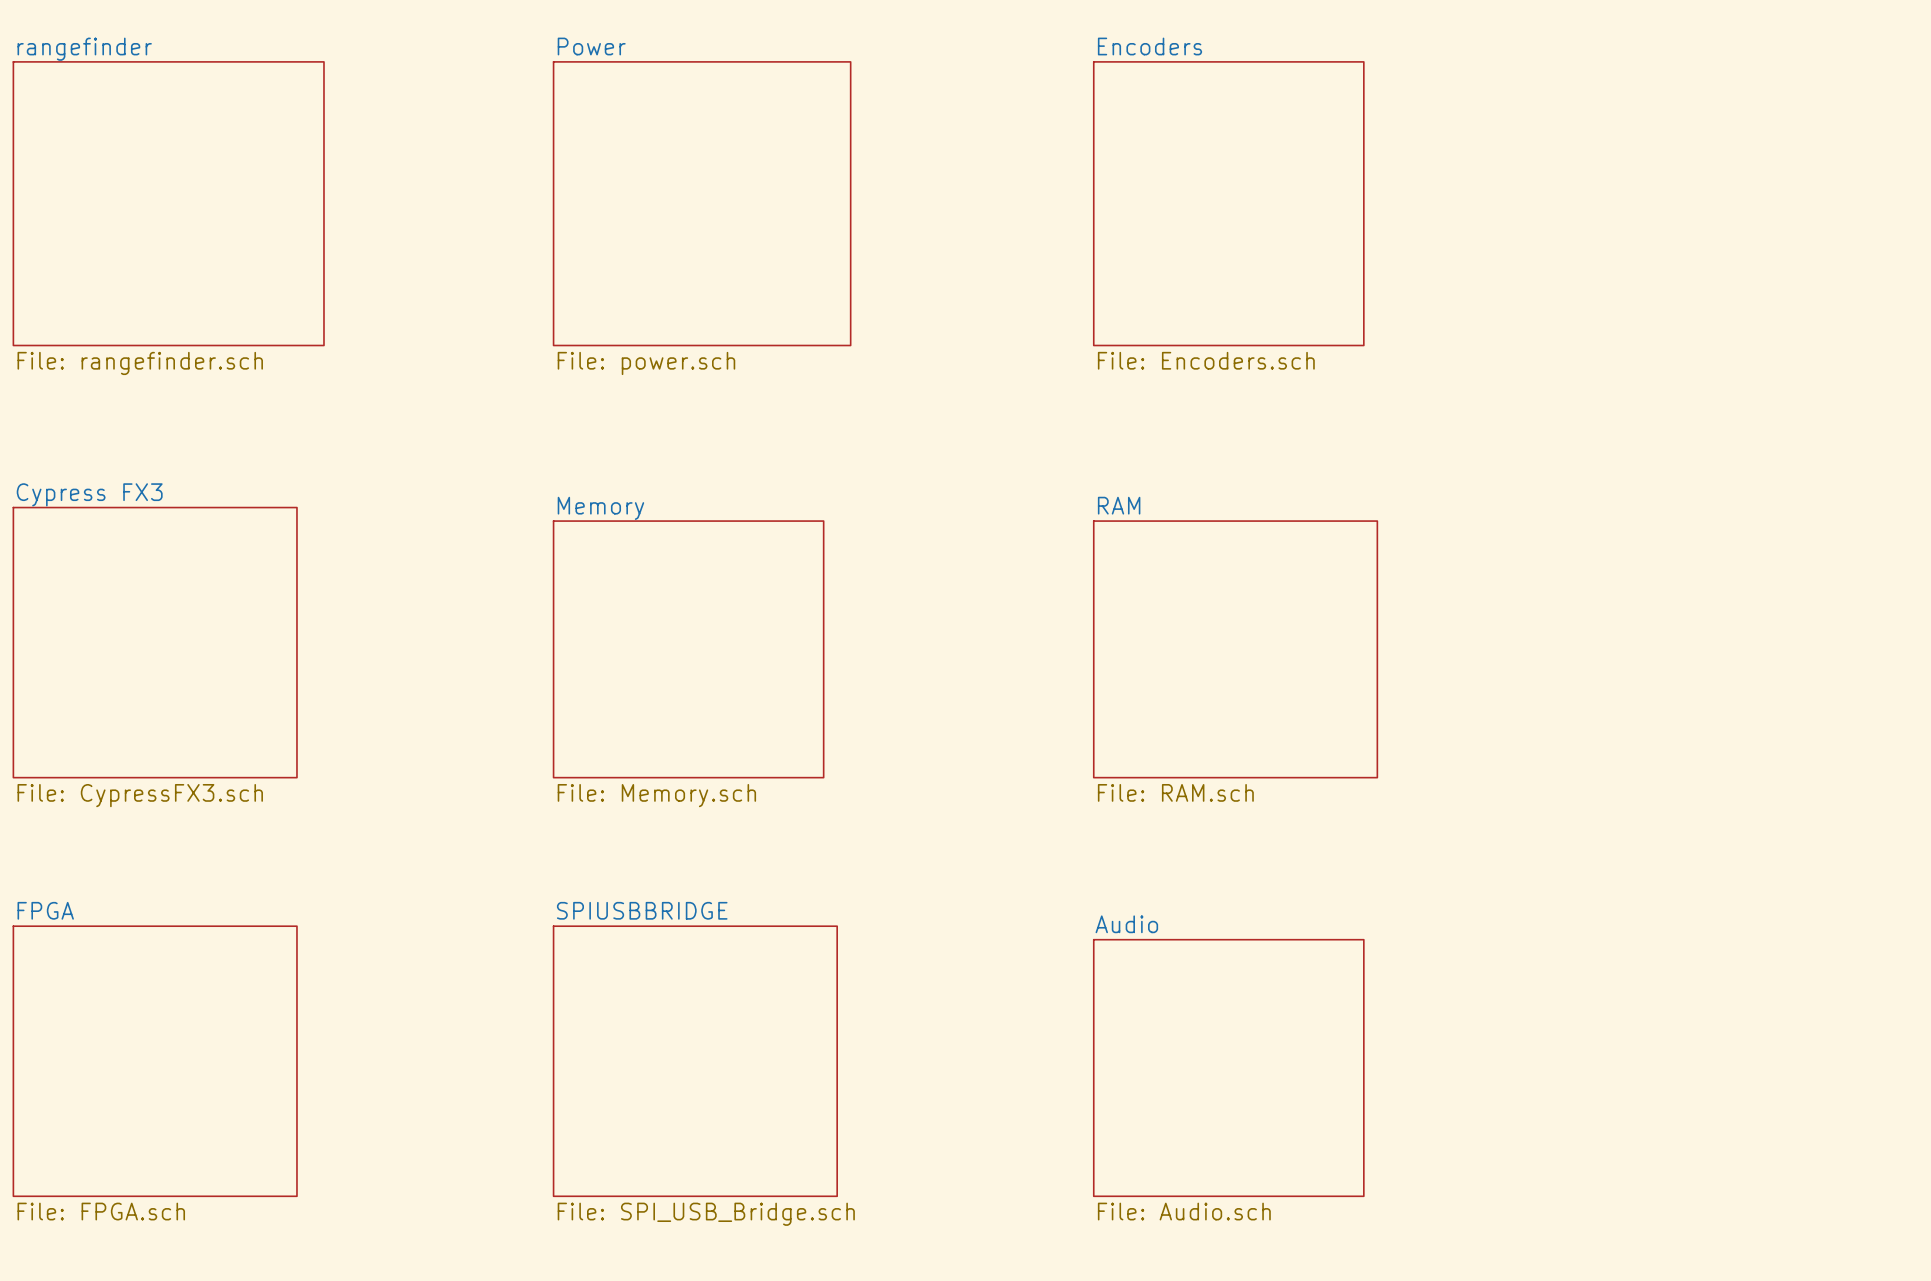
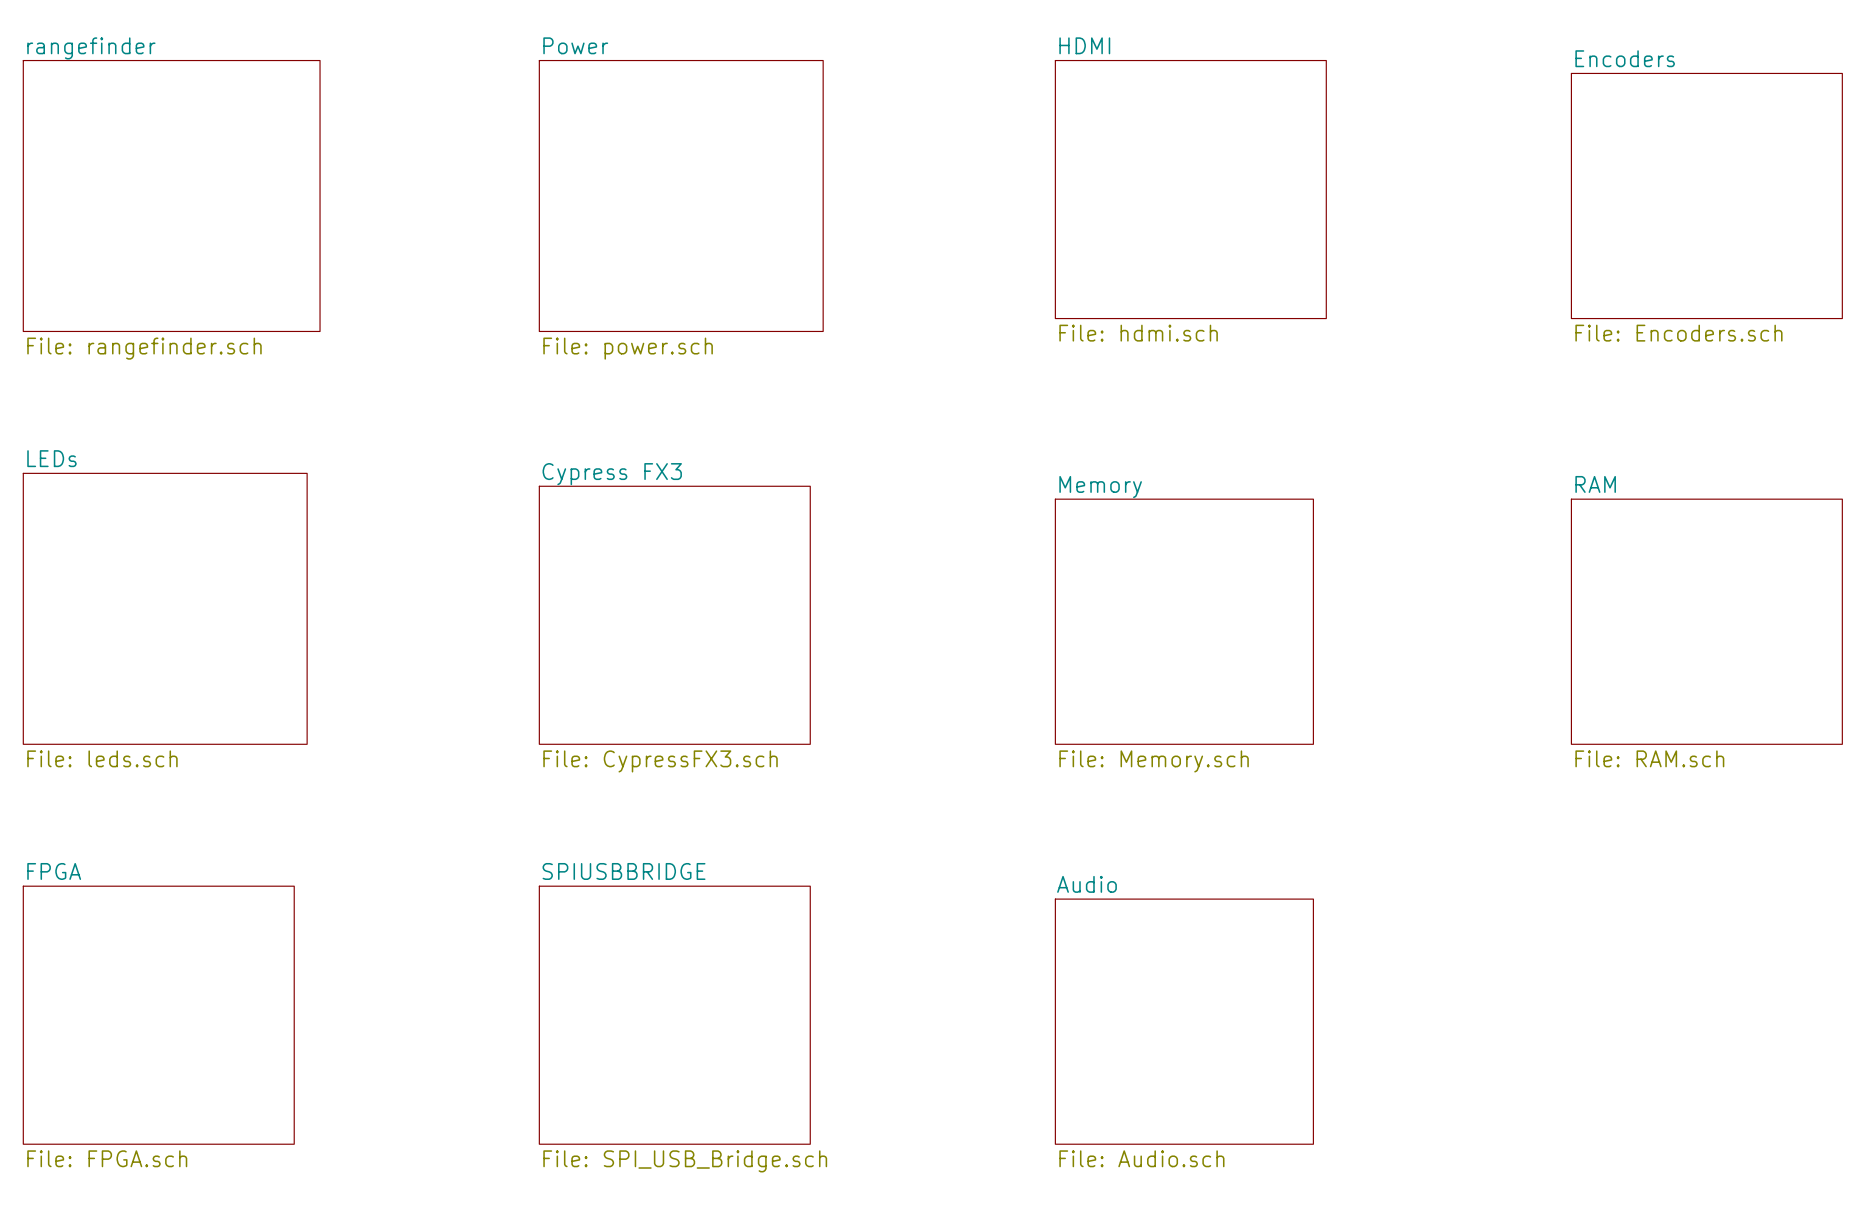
sheet HDMI: none -> File: hdmi.sch (1190, 189)
sheet Encoders: File: Encoders.sch (1228, 203) -> none
sheet Encoders: none -> File: Encoders.sch (1706, 196)
sheet LEDs: none -> File: leds.sch (165, 608)
sheet Cypress FX3 position: (155, 642) -> (674, 615)
sheet Memory: File: Memory.sch (688, 649) -> none
sheet Memory: none -> File: Memory.sch (1184, 621)
sheet RAM: File: RAM.sch (1235, 649) -> none
sheet RAM: none -> File: RAM.sch (1706, 621)

